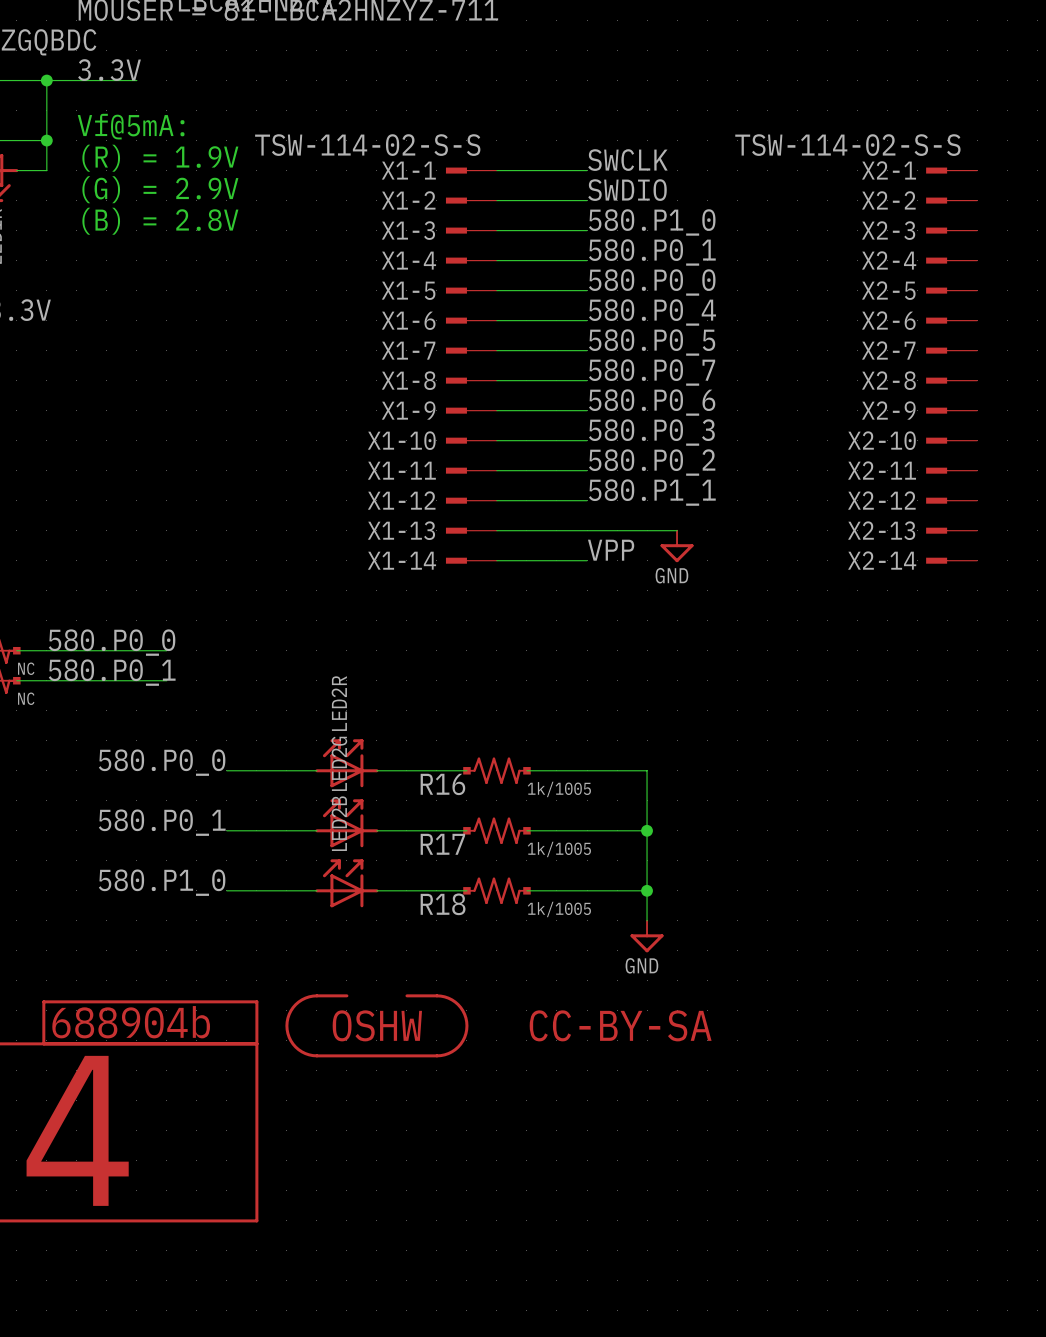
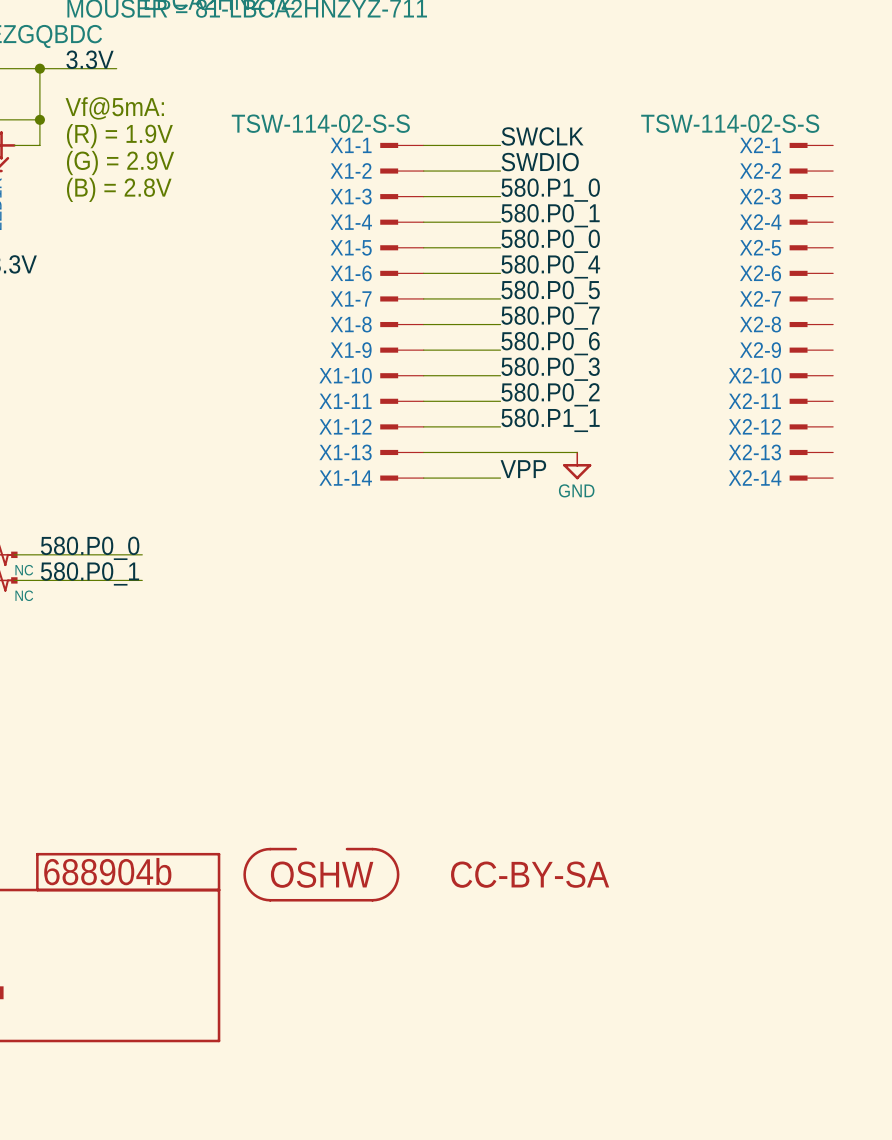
label: 580.P0_0 (162, 762) -> none
LED2R: (346, 763) -> none
wire: (226, 770) (316, 770) -> none
wire: (376, 770) (466, 770) -> none
R16: 1k/1005 (496, 770) -> none
wire: (526, 770) (647, 770) (647, 920) -> none
label: 580.P0_1 (162, 822) -> none
LED2G: (346, 823) -> none
wire: (226, 830) (316, 830) -> none
wire: (376, 830) (466, 830) -> none
R17: 1k/1005 (496, 830) -> none
wire: (526, 830) (647, 830) -> none
junction: (647, 830) -> none
label: 580.P1_0 (162, 882) -> none
LED2B: (346, 883) -> none
wire: (226, 890) (316, 890) -> none
wire: (376, 890) (466, 890) -> none
R18: 1k/1005 (496, 890) -> none
wire: (526, 890) (647, 890) -> none
junction: (647, 890) -> none
power symbol: GND (647, 936) -> none

